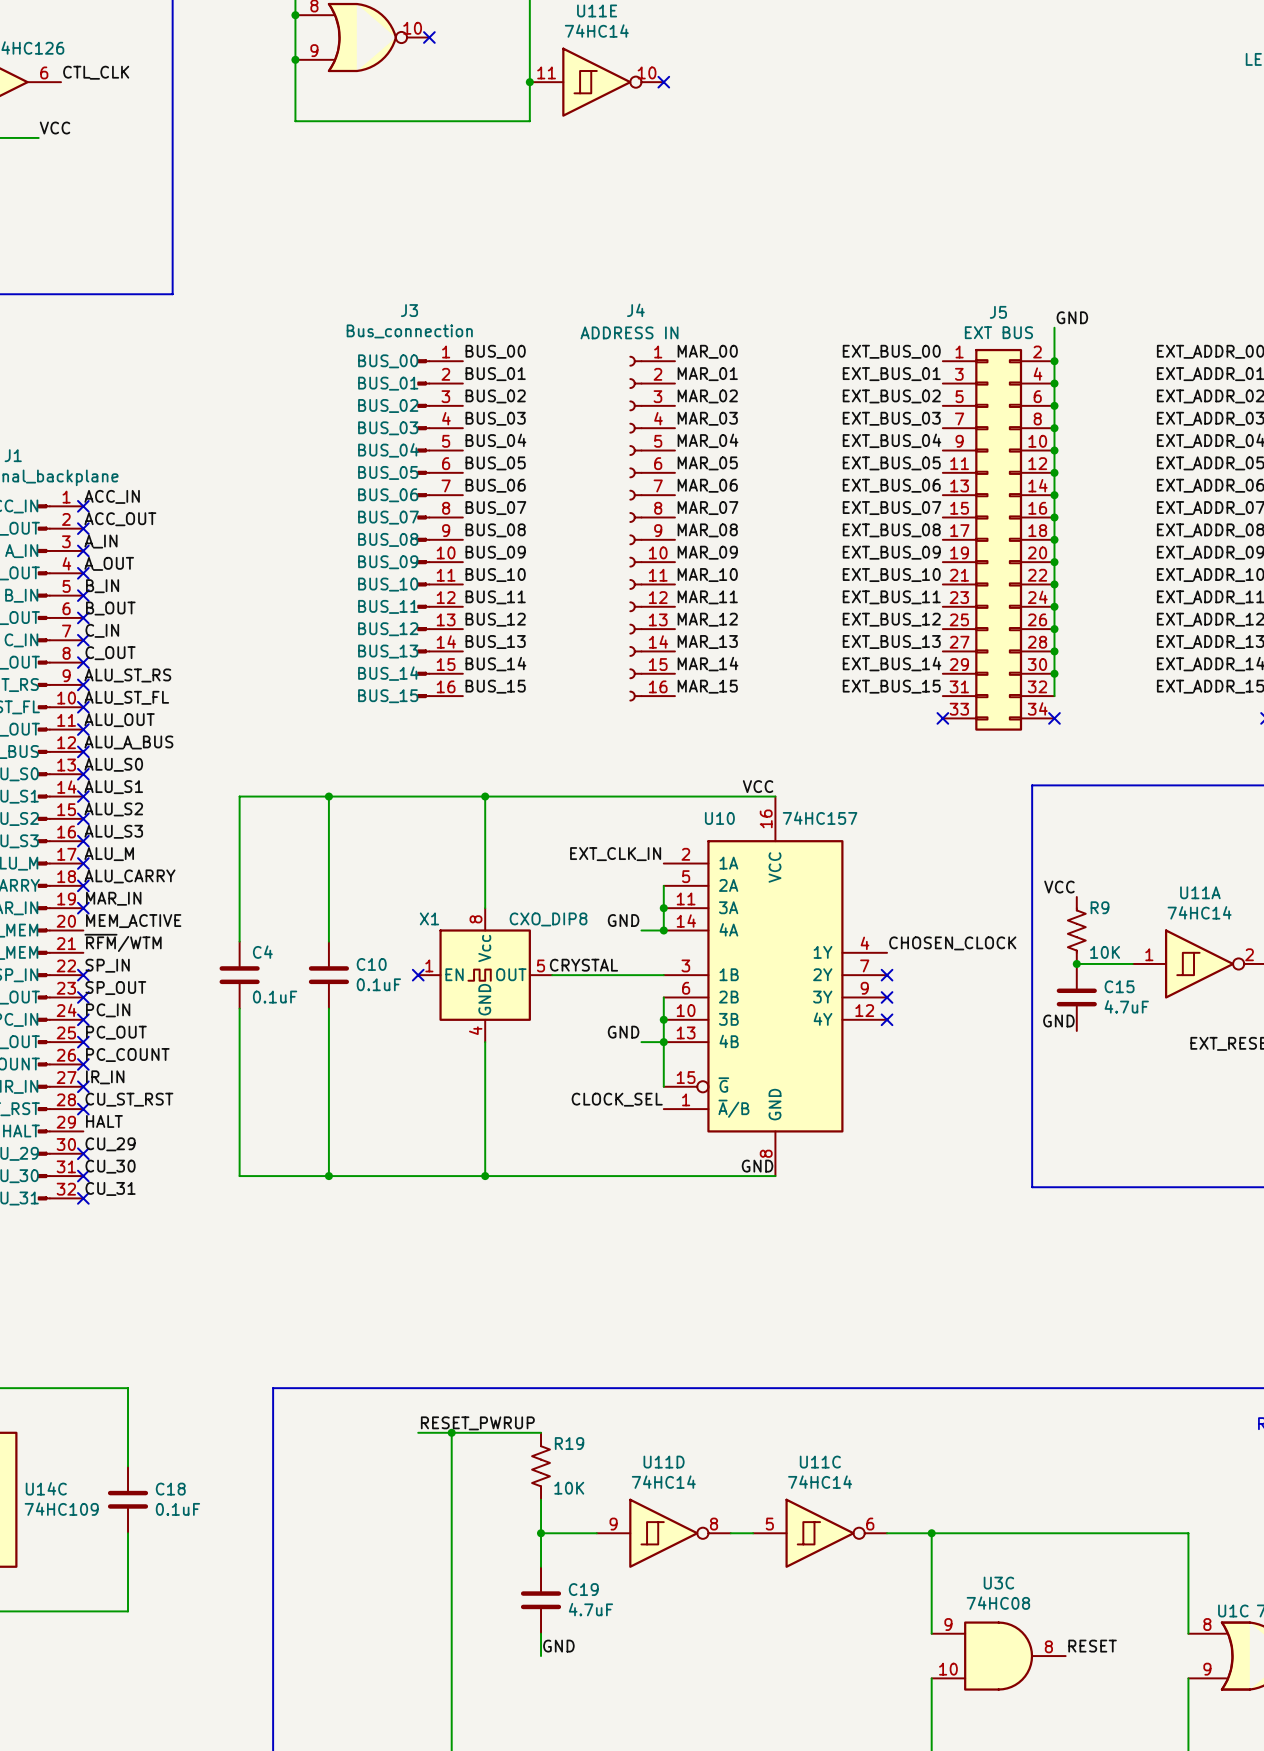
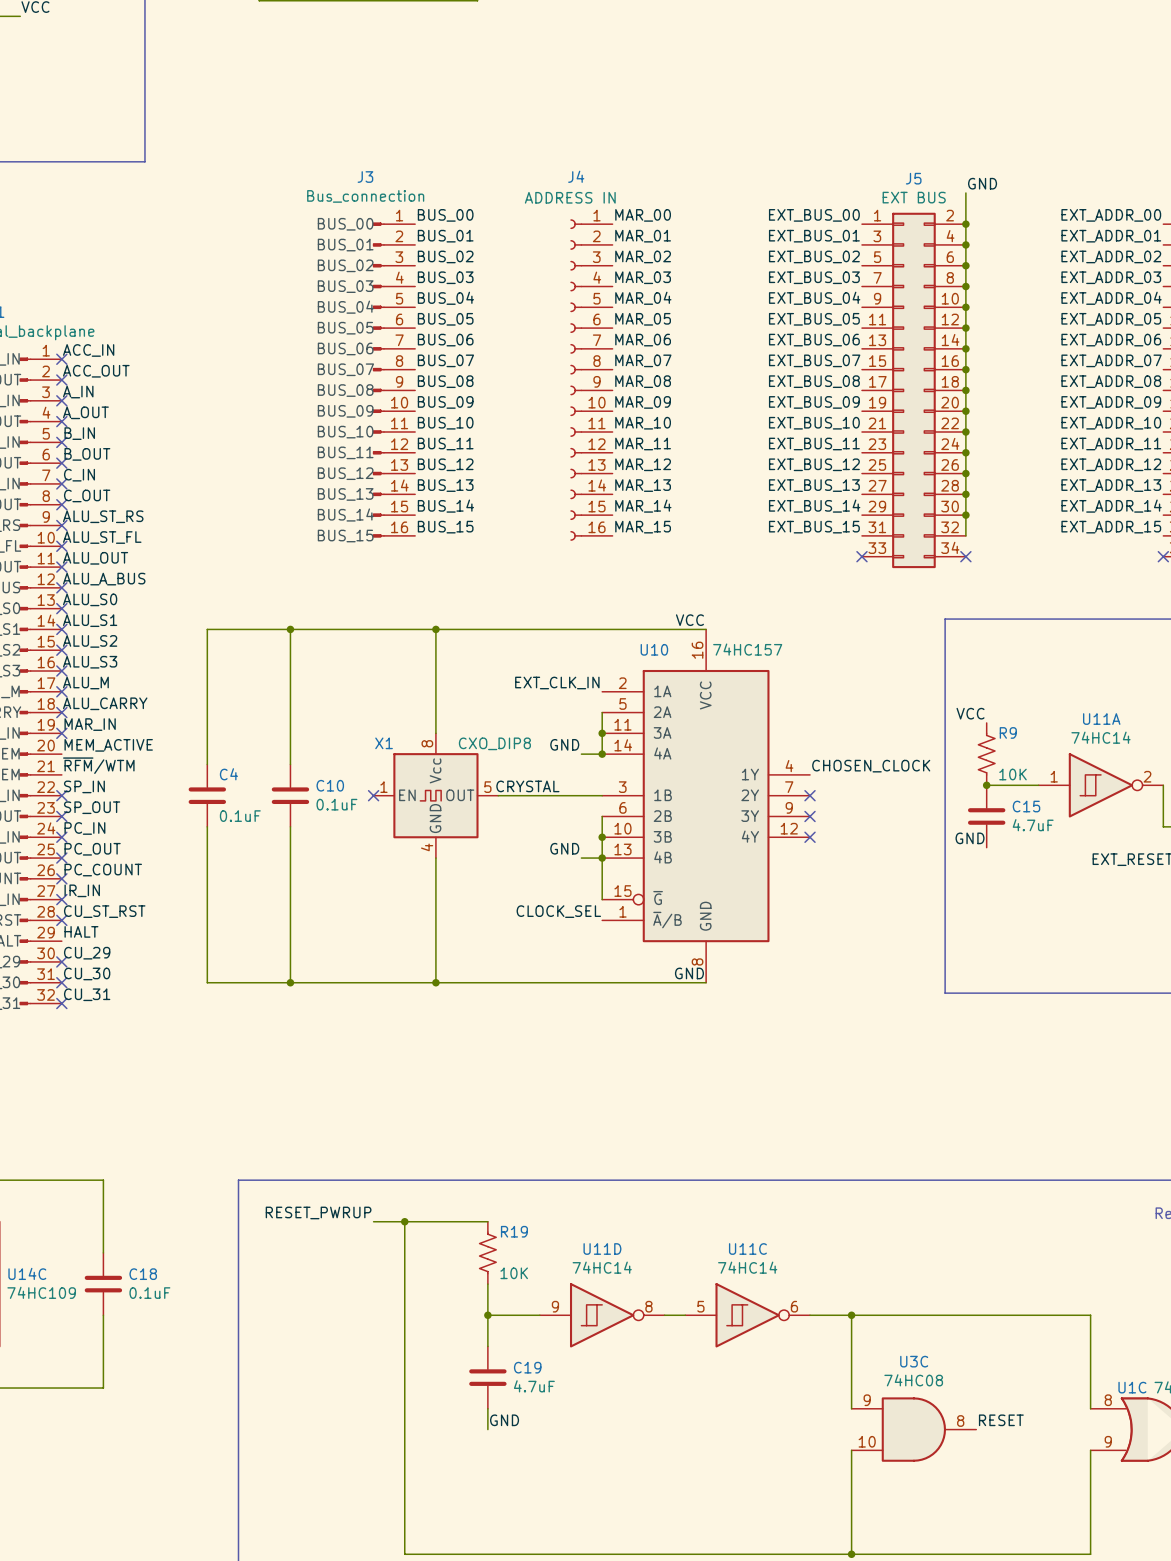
label position: RESET_PWRUP (477, 1423) -> RESET_PWRUP (318, 1212)

